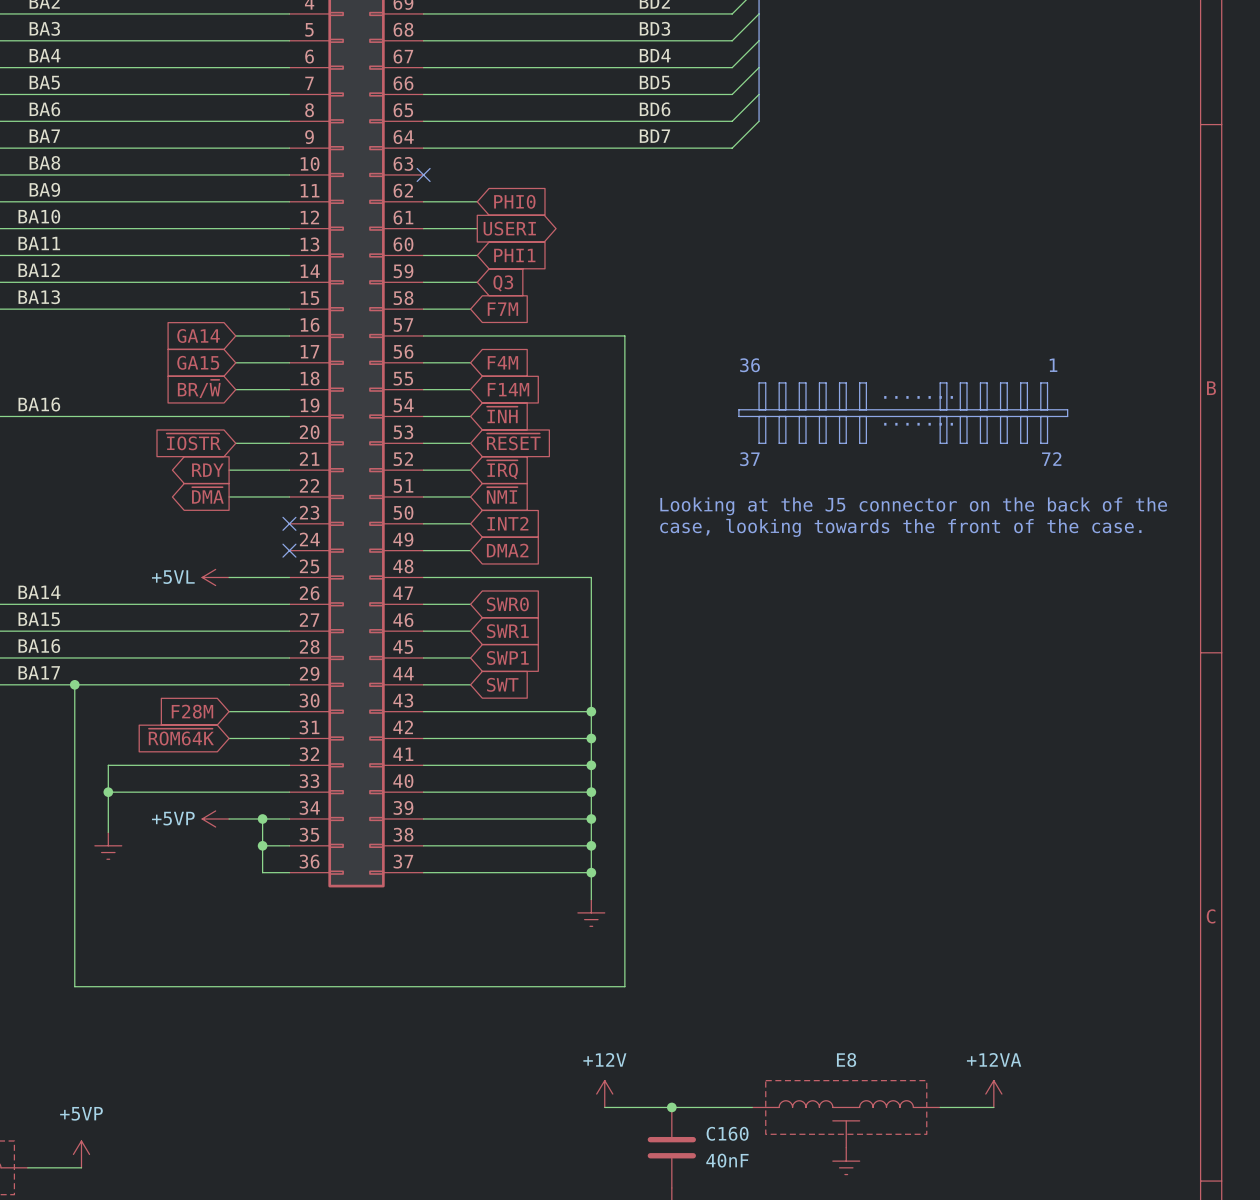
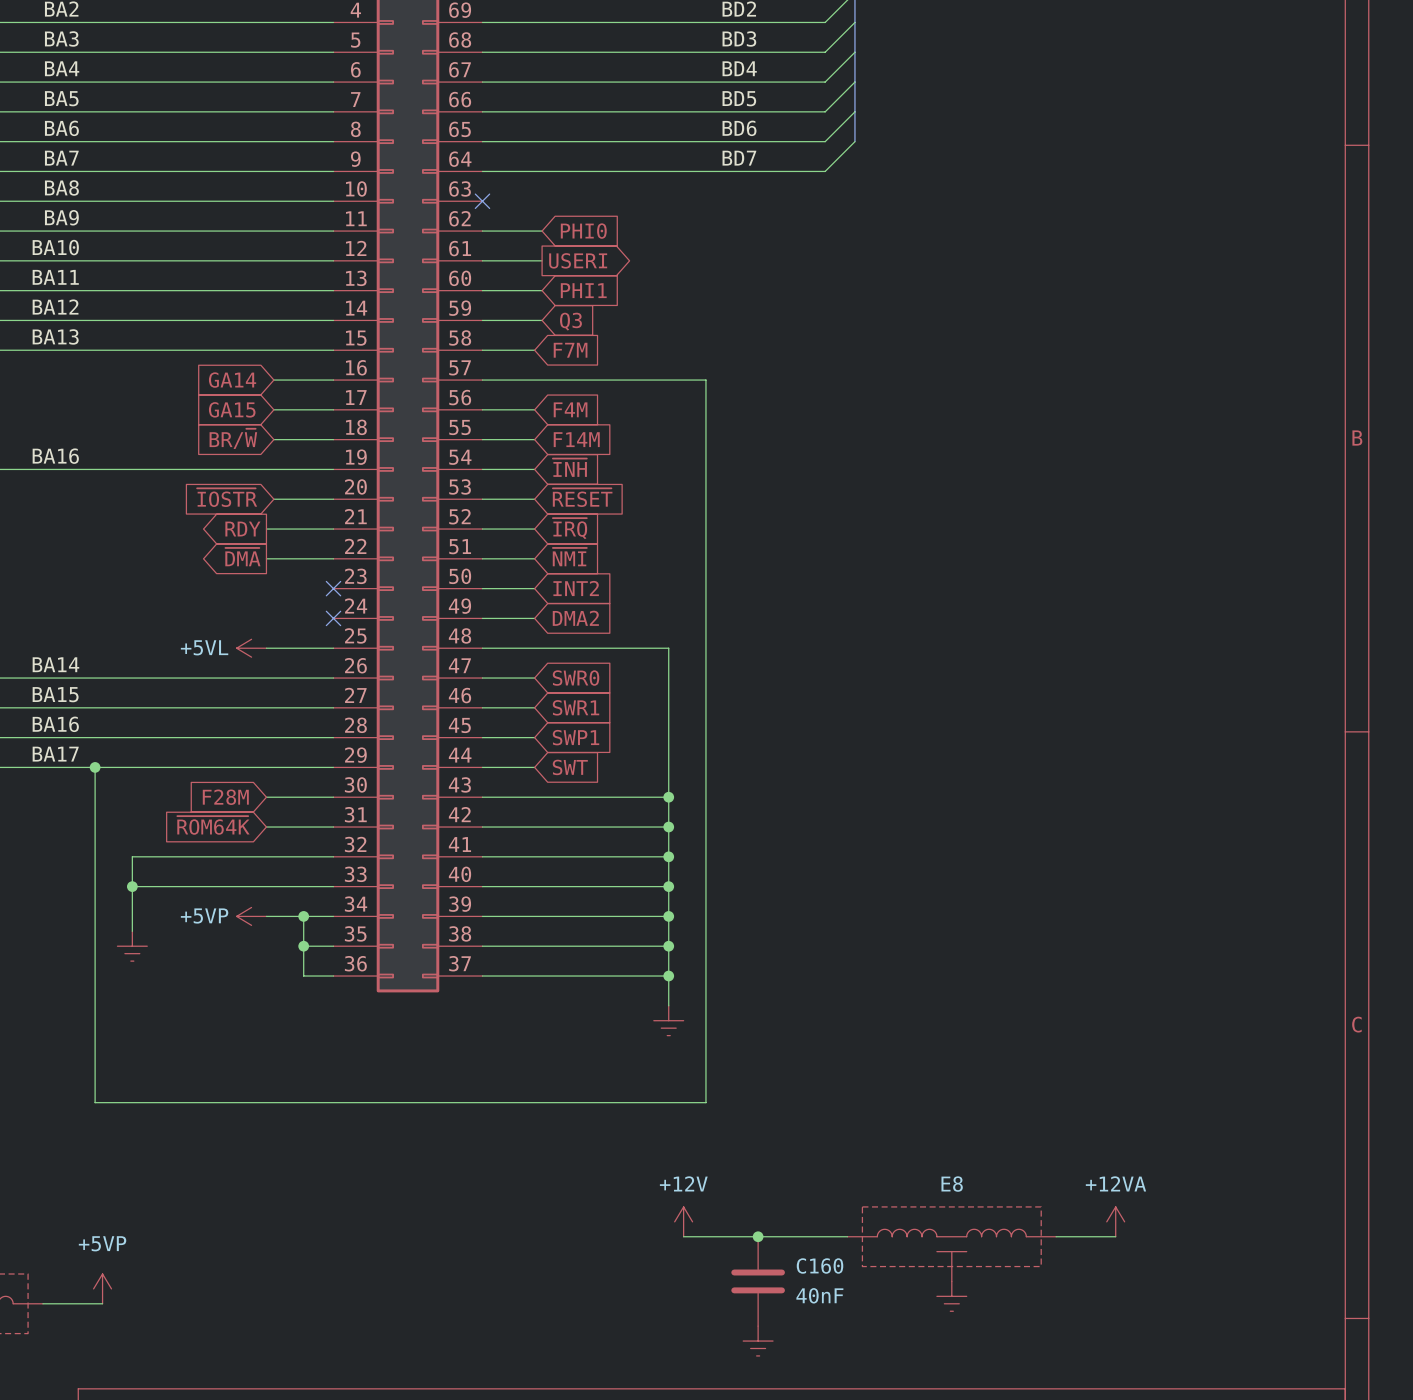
text: 36 (750, 365) -> none
text: 1 (1053, 365) -> none
text: ....... (918, 397) -> none
line: (738, 409) (1067, 409) (1067, 416) (738, 416) (738, 409) -> none
line: (759, 409) (759, 382) (765, 382) (765, 409) -> none
line: (779, 409) (779, 382) (785, 382) (785, 409) -> none
line: (799, 409) (799, 382) (806, 382) (806, 409) -> none
line: (819, 409) (819, 382) (826, 382) (826, 409) -> none
line: (839, 409) (839, 382) (846, 382) (846, 409) -> none
line: (859, 409) (859, 382) (866, 382) (866, 409) -> none
line: (940, 409) (940, 382) (946, 382) (946, 409) -> none
line: (960, 409) (960, 382) (967, 382) (967, 409) -> none
line: (980, 409) (980, 382) (987, 382) (987, 409) -> none
line: (1000, 409) (1000, 382) (1007, 382) (1007, 409) -> none
line: (1020, 409) (1020, 382) (1027, 382) (1027, 409) -> none
line: (1040, 409) (1040, 382) (1047, 382) (1047, 409) -> none
line: (759, 416) (759, 443) (765, 443) (765, 416) -> none
line: (779, 416) (779, 443) (785, 443) (785, 416) -> none
line: (799, 416) (799, 443) (806, 443) (806, 416) -> none
line: (819, 416) (819, 443) (826, 443) (826, 416) -> none
line: (839, 416) (839, 443) (846, 443) (846, 416) -> none
line: (859, 416) (859, 443) (866, 443) (866, 416) -> none
line: (940, 416) (940, 443) (946, 443) (946, 416) -> none
line: (960, 416) (960, 443) (967, 443) (967, 416) -> none
line: (980, 416) (980, 443) (987, 443) (987, 416) -> none
line: (1000, 416) (1000, 443) (1007, 443) (1007, 416) -> none
line: (1020, 416) (1020, 443) (1027, 443) (1027, 416) -> none
line: (1040, 416) (1040, 443) (1047, 443) (1047, 416) -> none
text: ....... (918, 424) -> none
text: 37 (749, 459) -> none
text: 72 (1051, 459) -> none
text: Looking at the J5 connector on the back of the (913, 506) -> none
text: case, looking towards the front of the case. (900, 527) -> none

